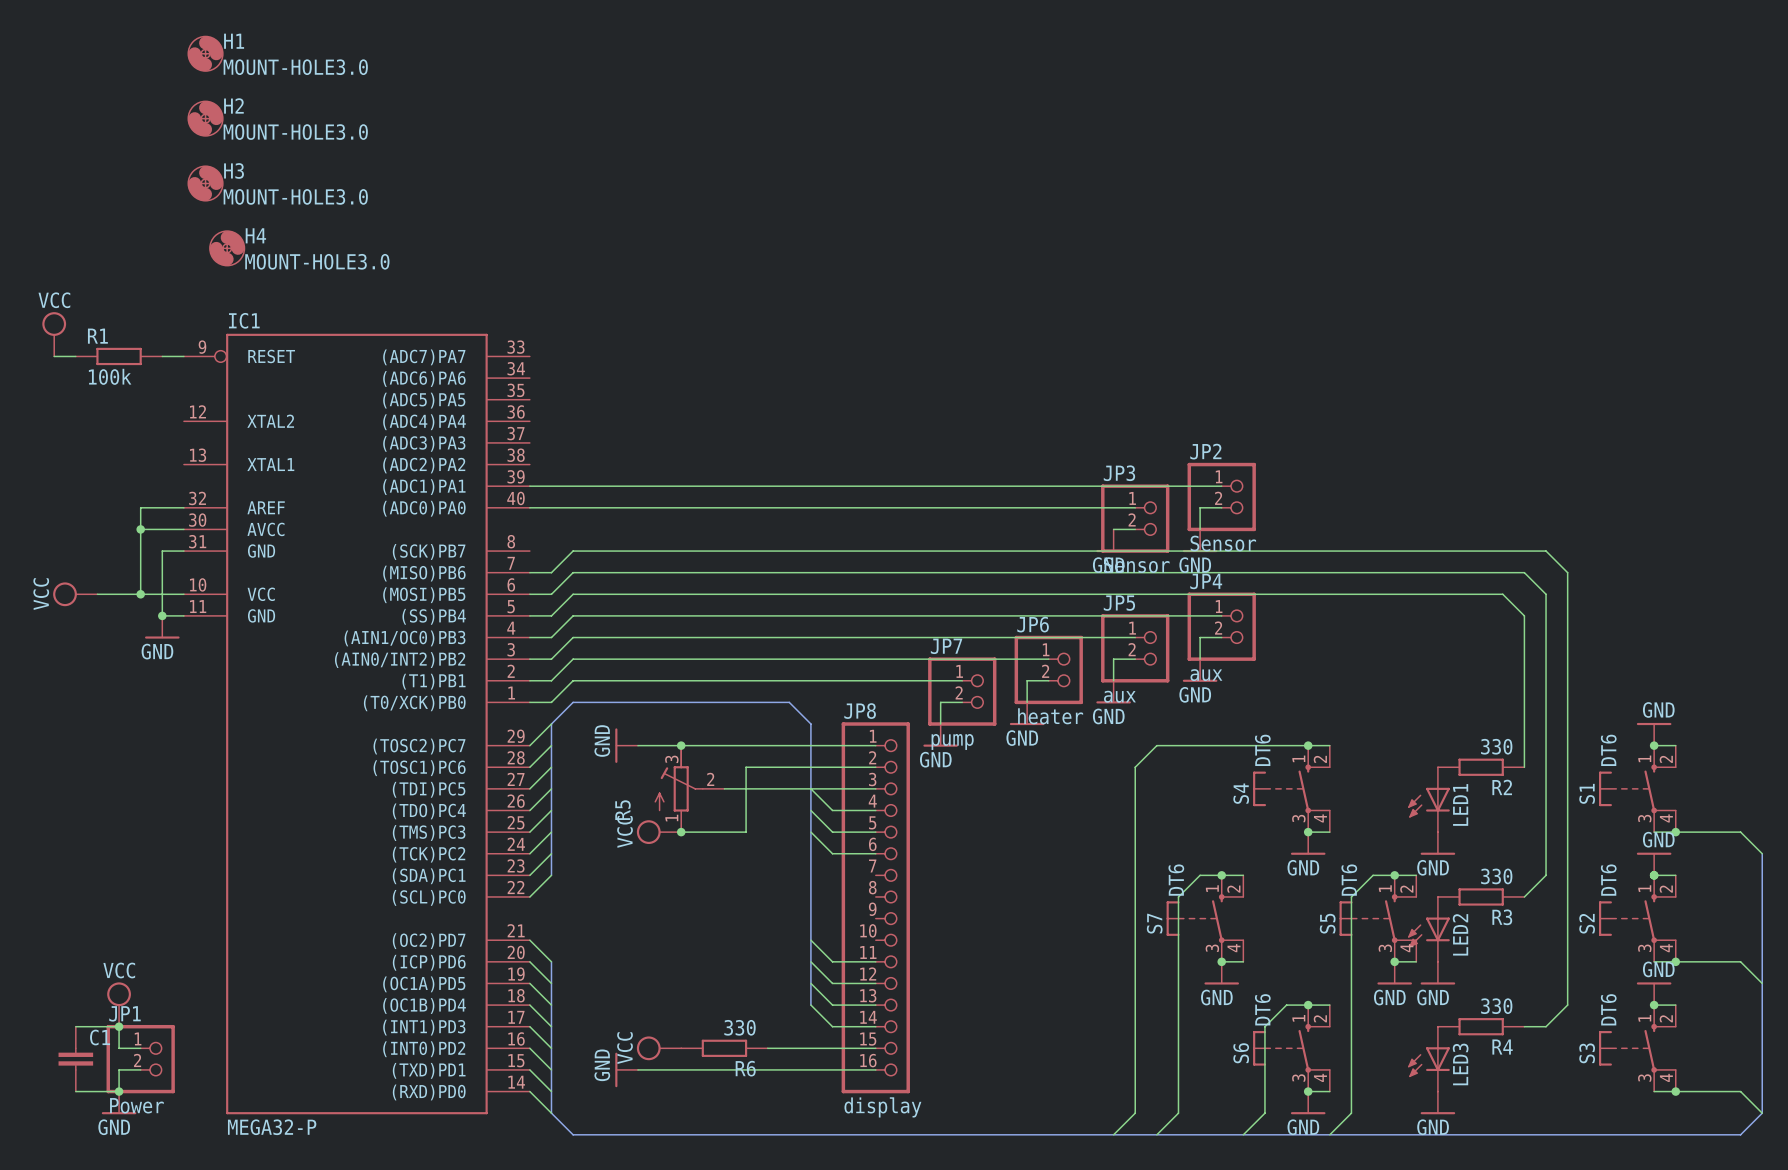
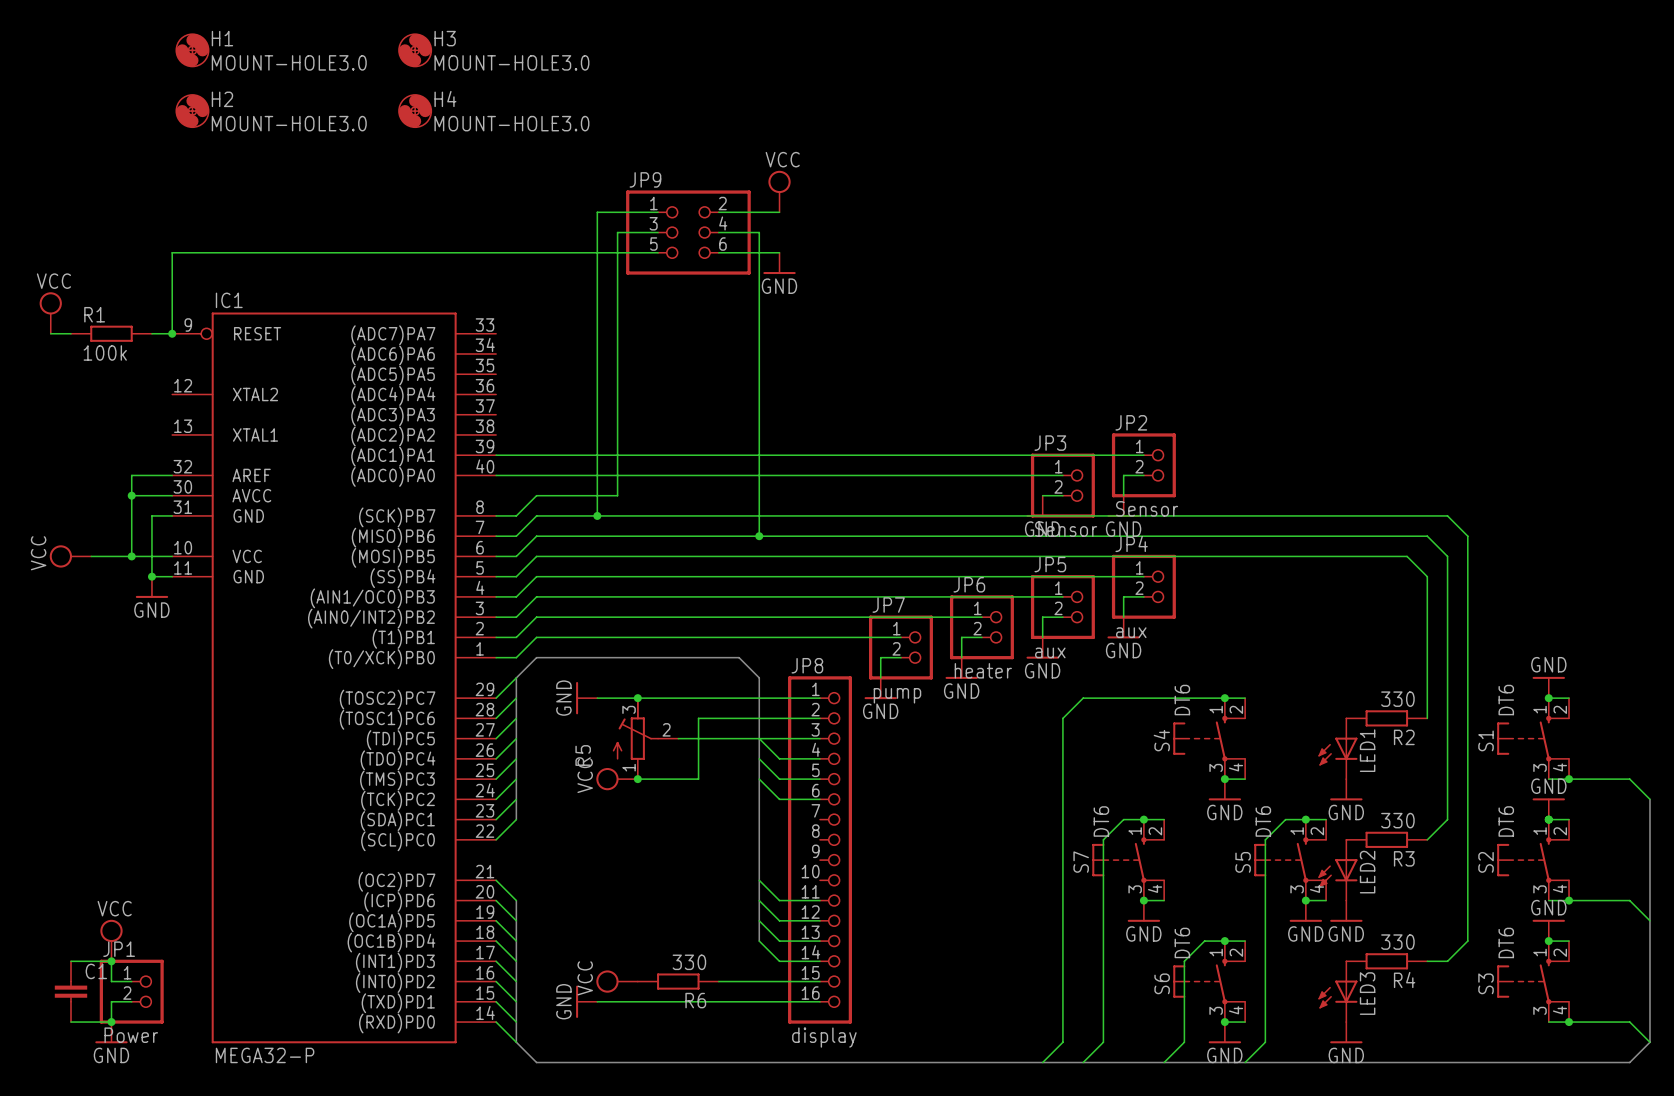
H3 position: (205, 183) -> (415, 50)
power symbol: none -> VCC (779, 191)
wire: none -> (658, 212) (597, 212) (597, 515)
wire: none -> (718, 212) (779, 212)
H4 position: (227, 248) -> (415, 111)
wire: none -> (658, 232) (617, 232) (617, 495) (536, 495) (516, 515) (496, 515)
JP9: none -> (688, 232)
wire: none -> (718, 232) (759, 232) (759, 536)
wire: none -> (658, 252) (172, 252) (172, 333)
wire: none -> (718, 252) (779, 252)
power symbol: none -> GND (779, 263)
junction: none -> (172, 333)
junction: none -> (597, 515)
junction: none -> (759, 536)

